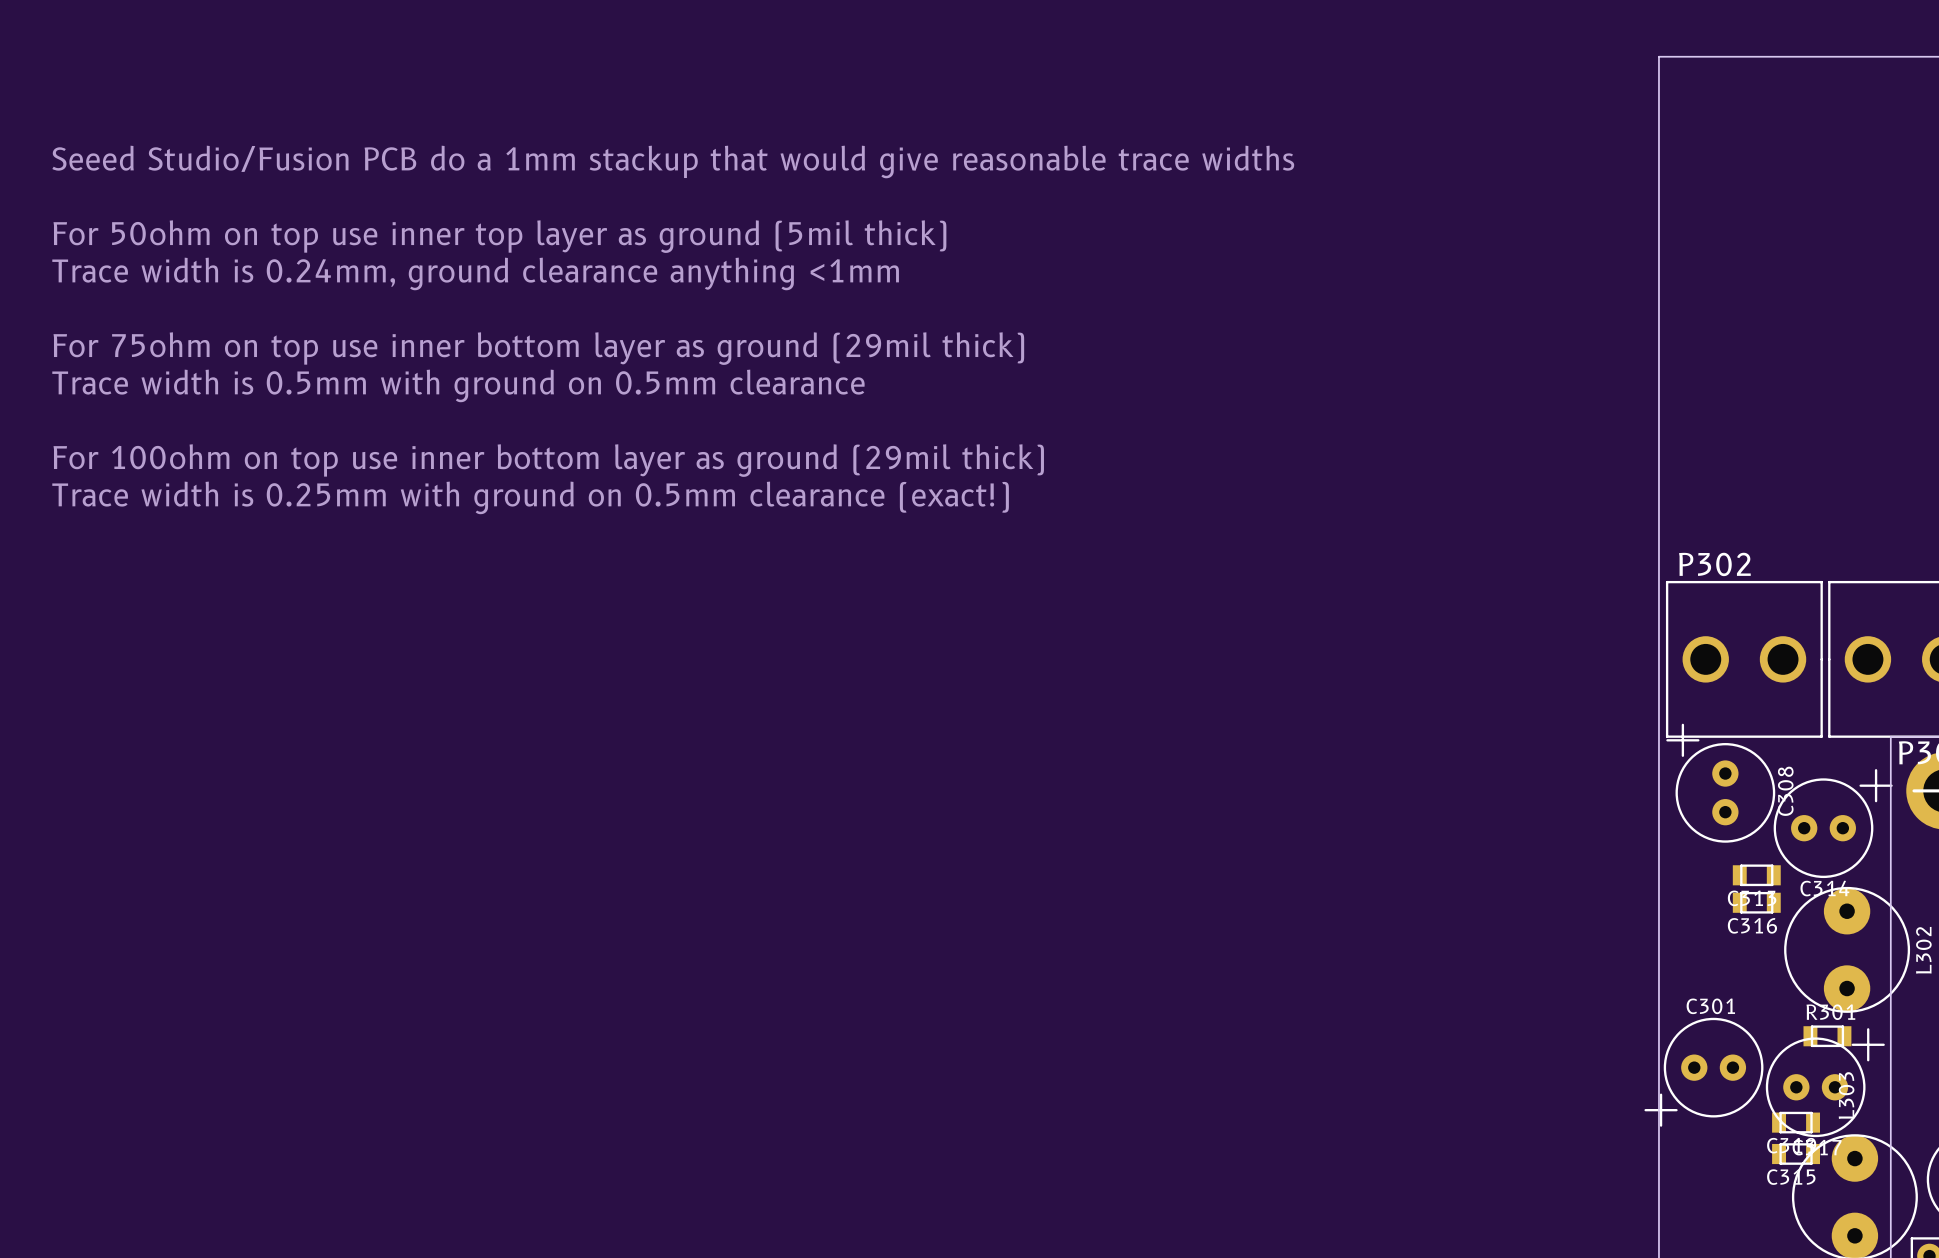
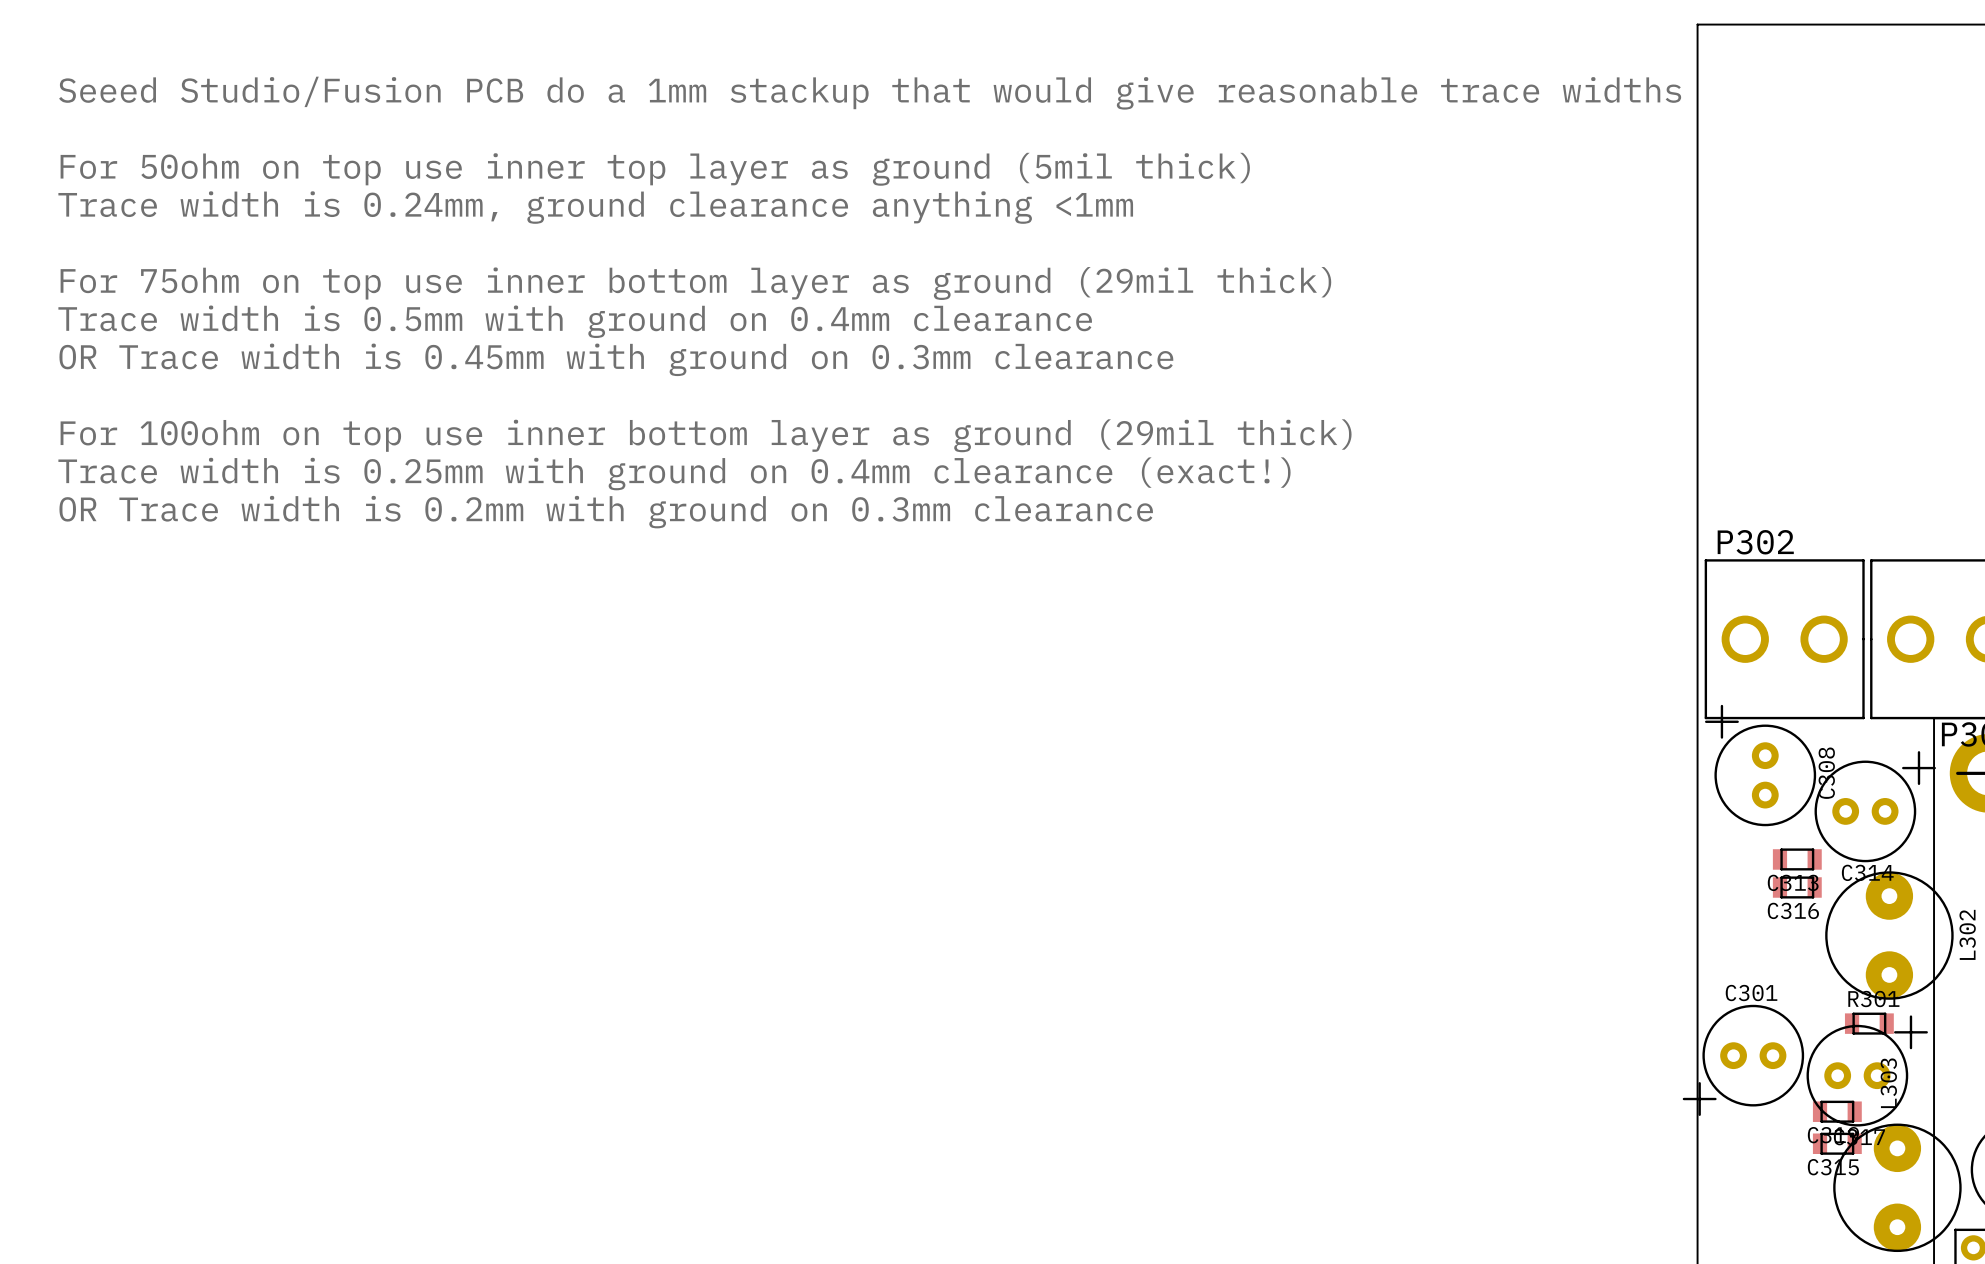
text position: Seeed Studio/Fusion PCB do a 1mm stackup that would give reasonable trace widths (673, 161) -> Seeed Studio/Fusion PCB do a 1mm stackup that would give reasonable trace widths (870, 93)
text: none -> For 50ohm on top use inner top layer as ground (5mil thick) (655, 169)
text: For 50ohm on top use inner top layer as ground (5mil thick) (499, 236) -> Trace width is 0.24mm, ground clearance anything <1mm (595, 207)
text: Trace width is 0.24mm, ground clearance anything <1mm (475, 273) -> none
text: none -> For 75ohm on top use inner bottom layer as ground (29mil thick) (695, 283)
text: For 75ohm on top use inner bottom layer as ground (29mil thick) (538, 348) -> Trace width is 0.5mm with ground on 0.4mm clearance (575, 321)
text: Trace width is 0.5mm with ground on 0.5mm clearance (458, 385) -> OR Trace width is 0.45mm with ground on 0.3mm clearance (616, 359)
text: Trace width is 0.25mm with ground on 0.5mm clearance (exact!) (530, 497) -> Trace width is 0.25mm with ground on 0.4mm clearance (exact!) (674, 473)
text: none -> OR Trace width is 0.2mm with ground on 0.3mm clearance (606, 512)

